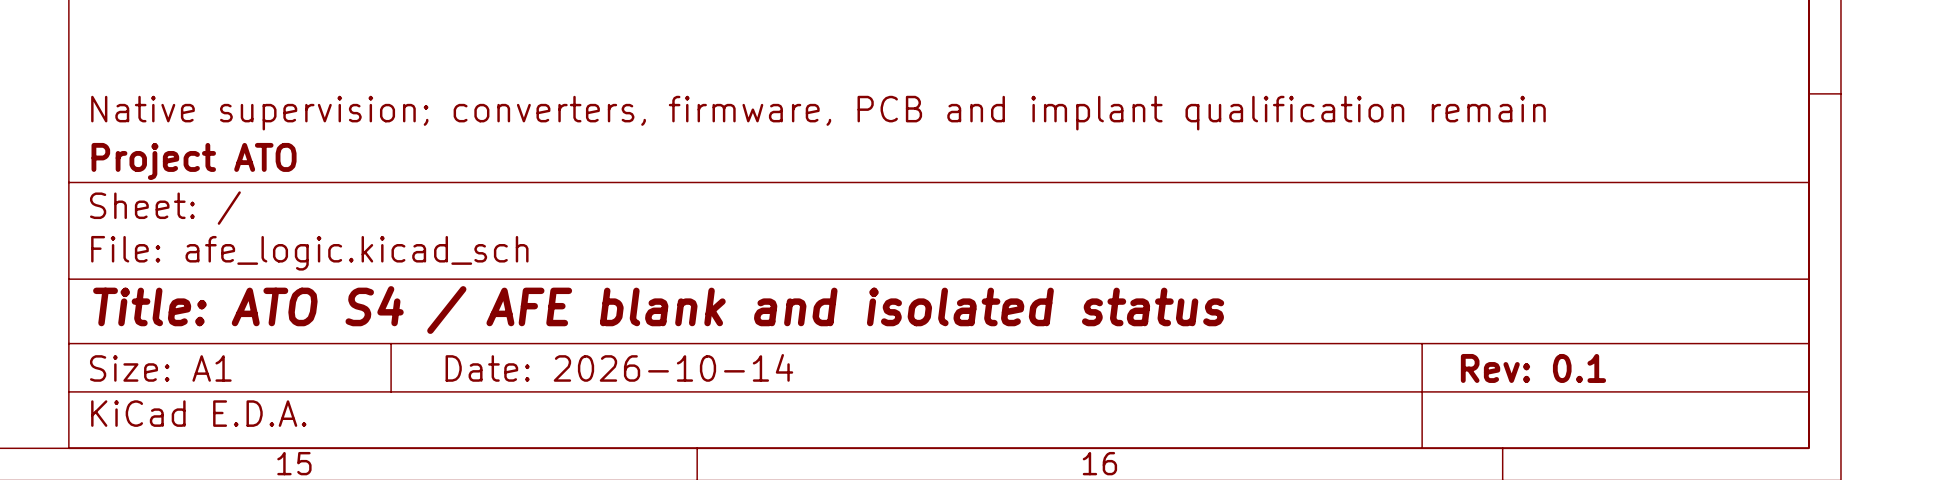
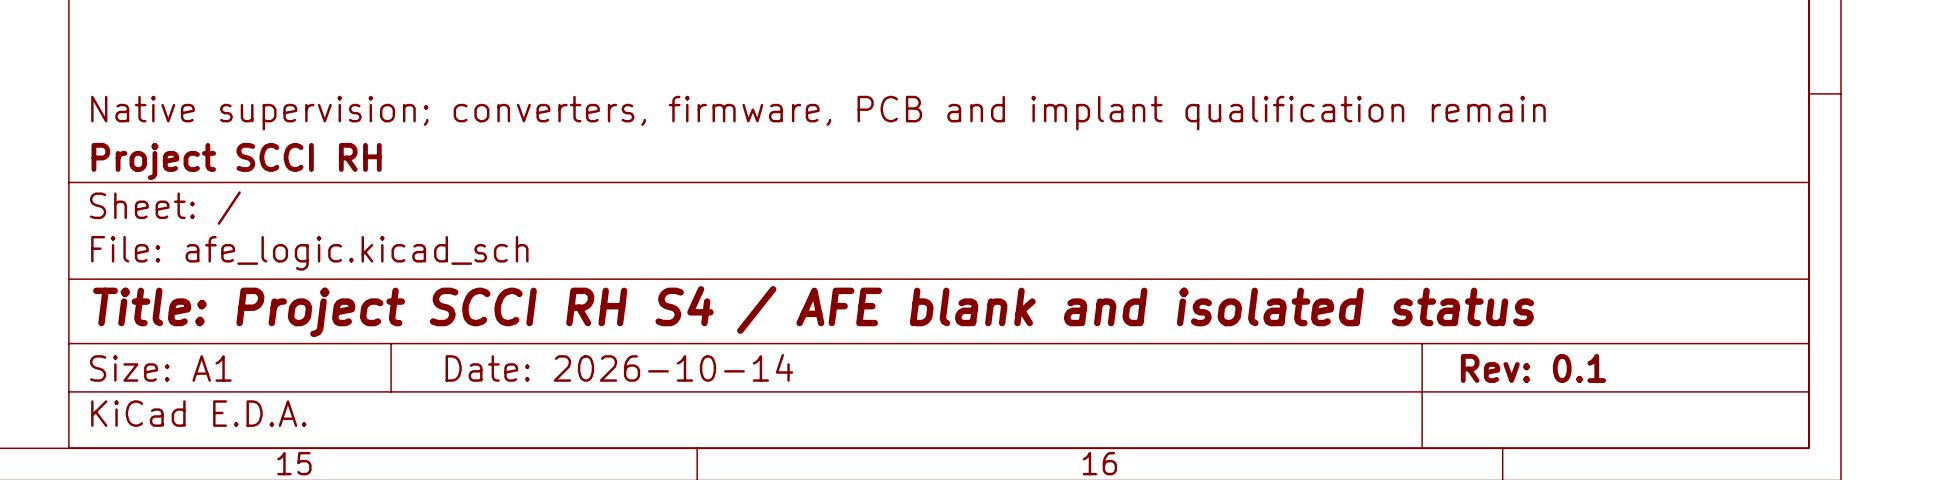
title block: Project ATO (194, 161) -> Project SCCI RH (236, 161)
title block: Title: ATO S4 / AFE blank and isolated status (658, 310) -> Title: Project SCCI RH S4 / AFE blank and isolated status (813, 311)

